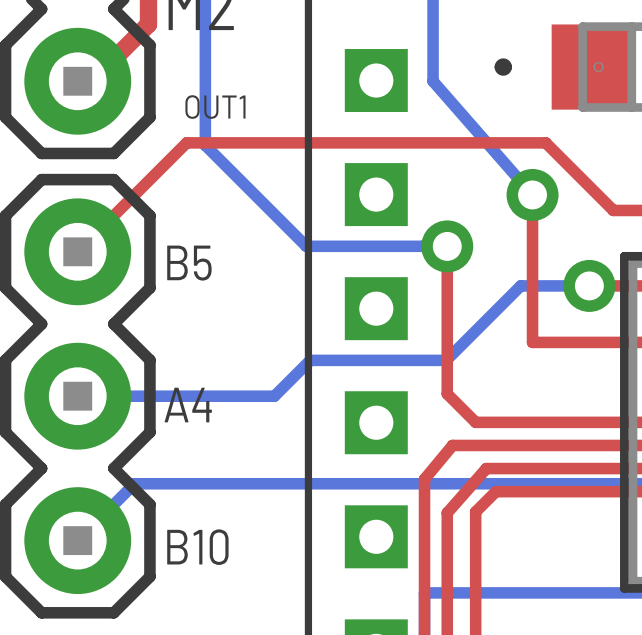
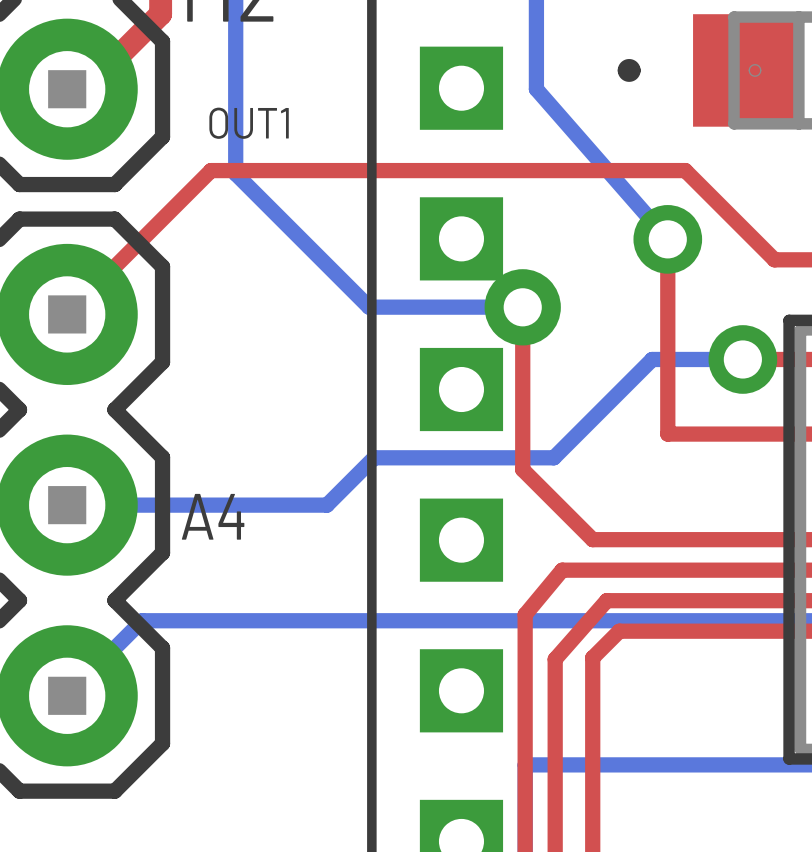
top track: (447, 246) (447, 393) -> (522, 307) (522, 469) (555, 502)
via position: (447, 246) -> (522, 307)
text: B5 (189, 263) -> none
text: B10 (197, 547) -> none

